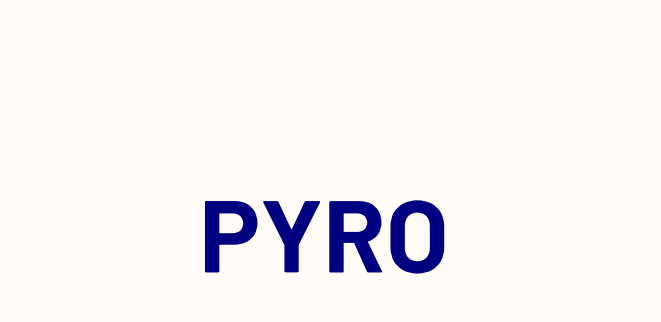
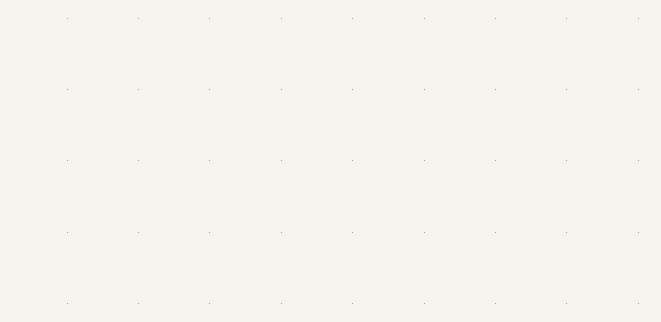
text: PYRO (324, 236) -> none

